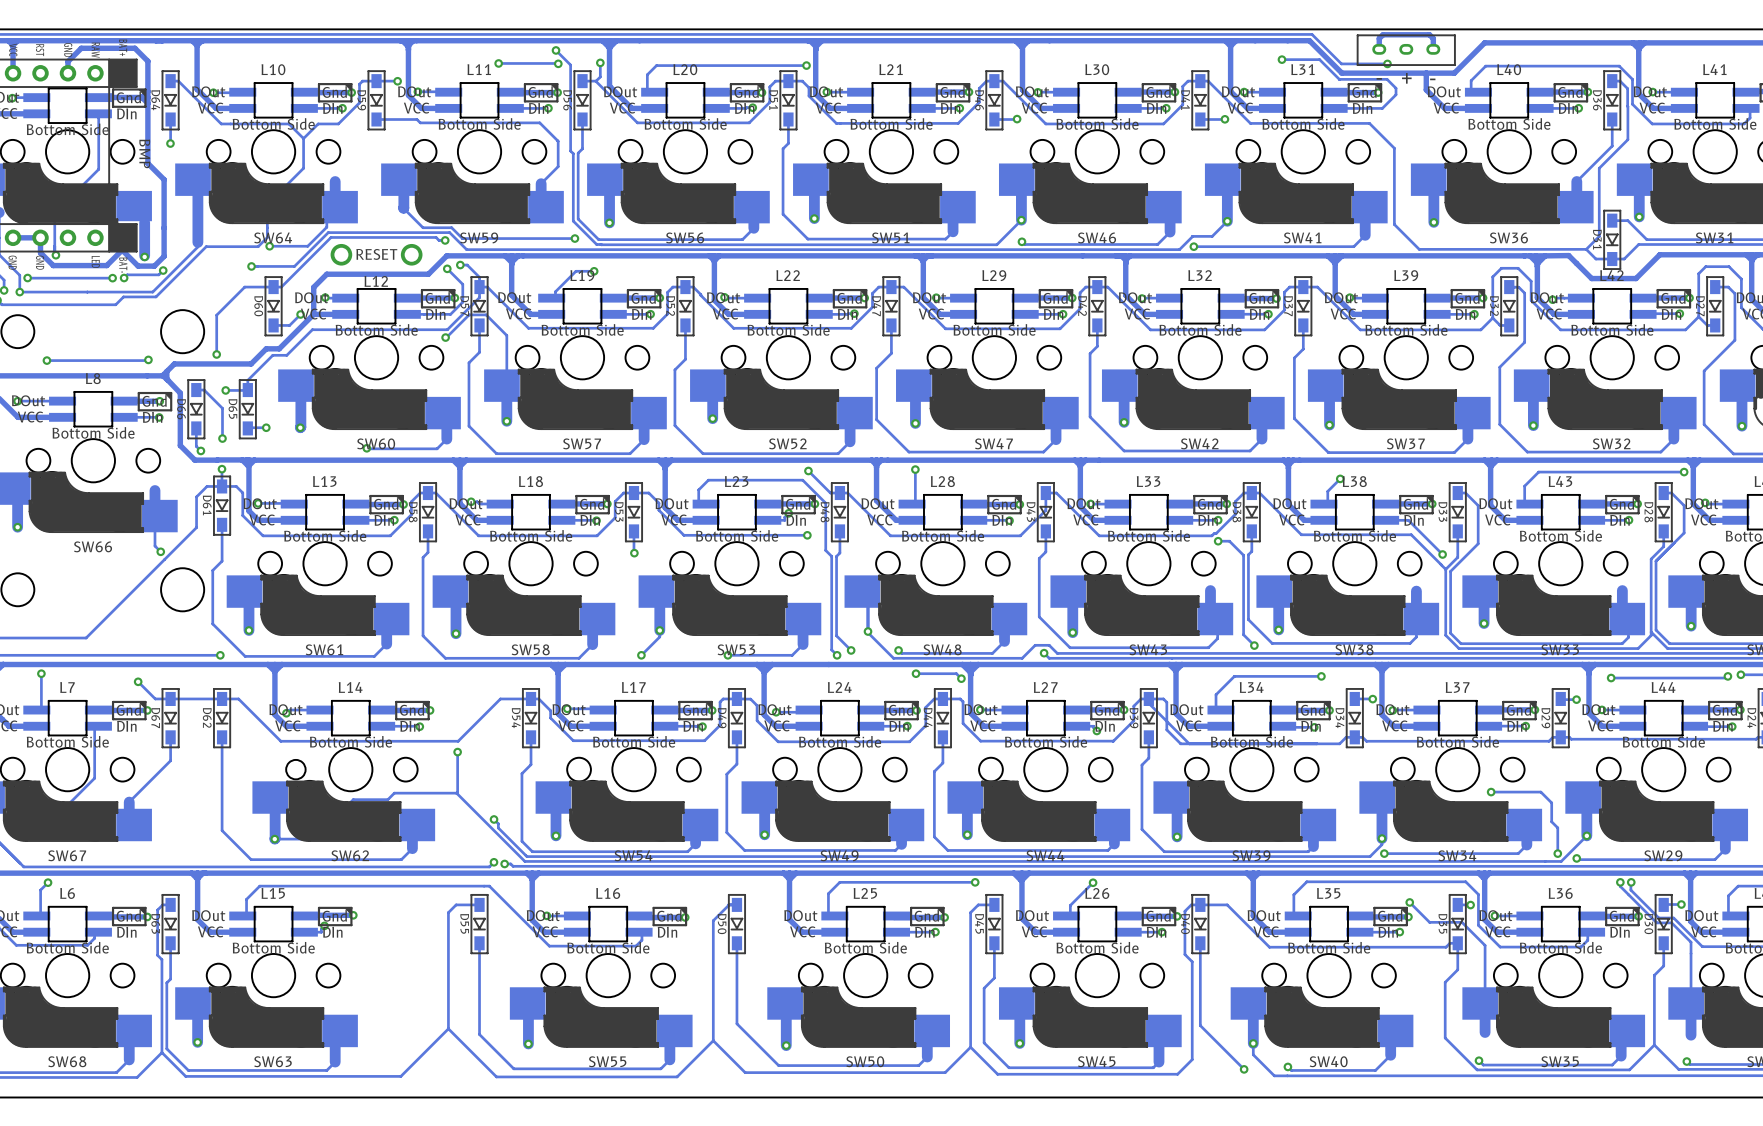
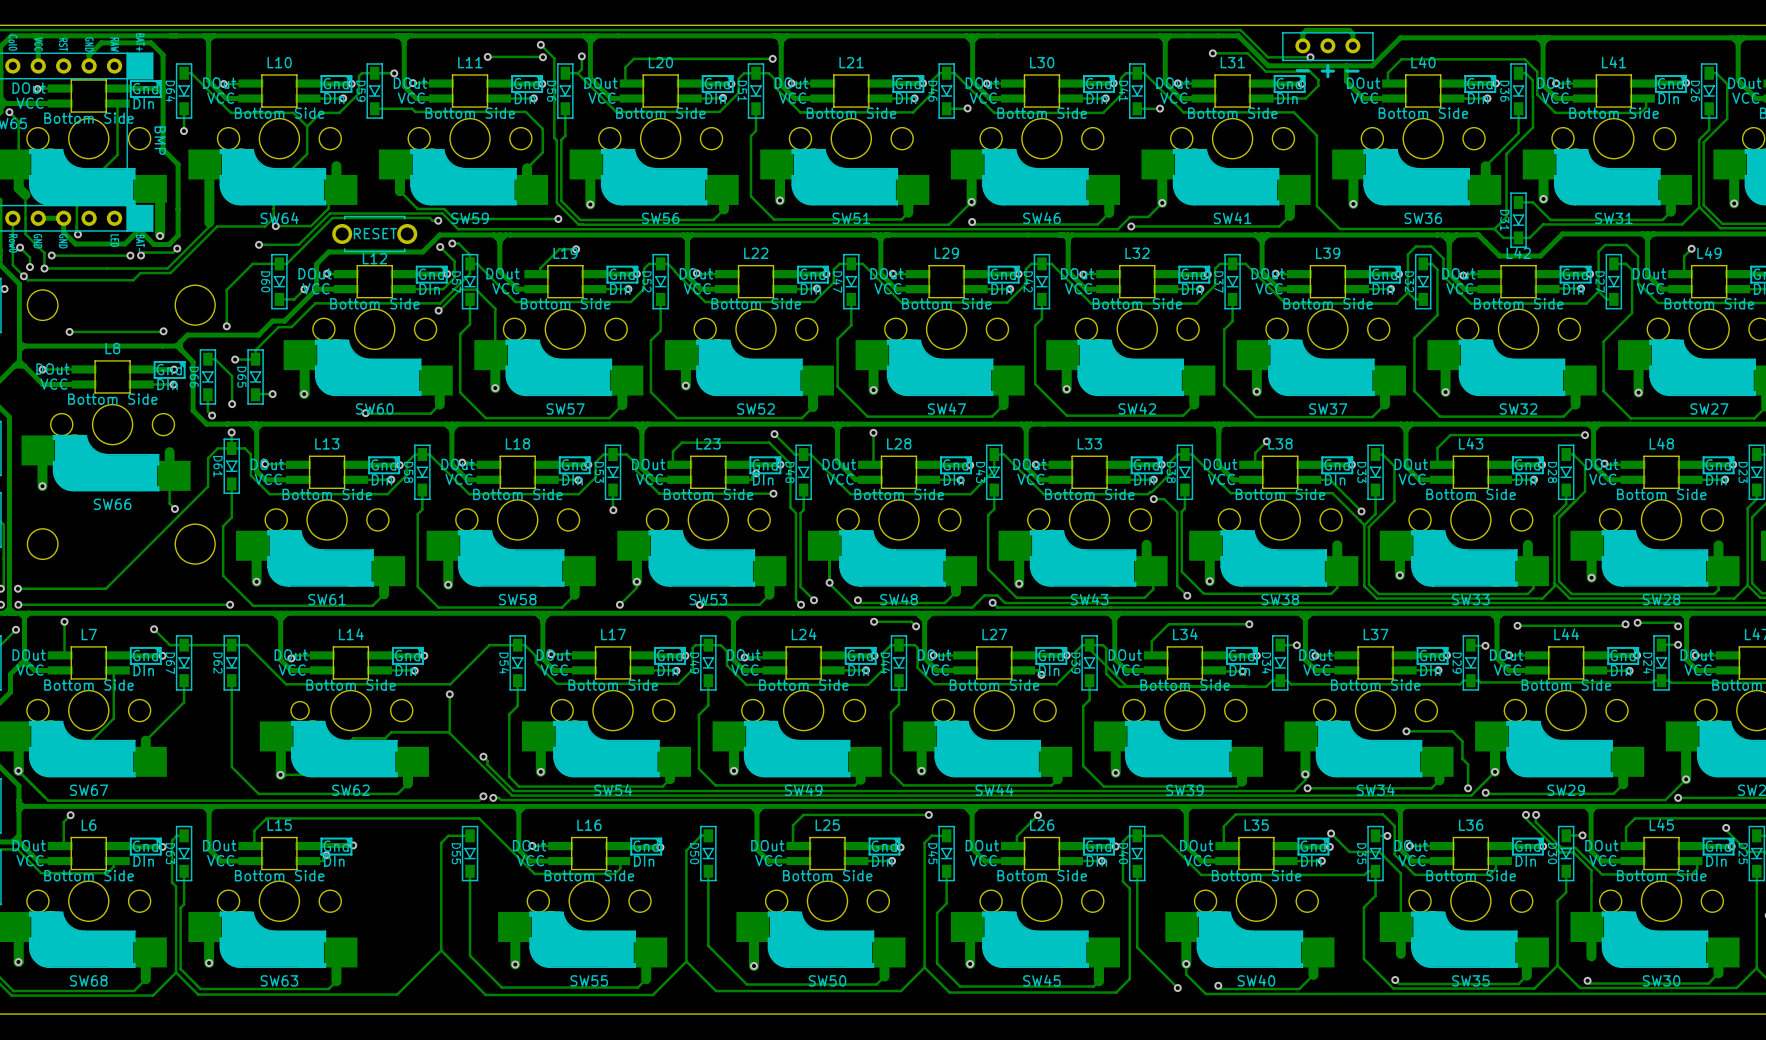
part footprint: [1356, 34, 1456, 66] -> [1282, 32, 1374, 62]
part side: bottom (376, 254) -> top (374, 233)

